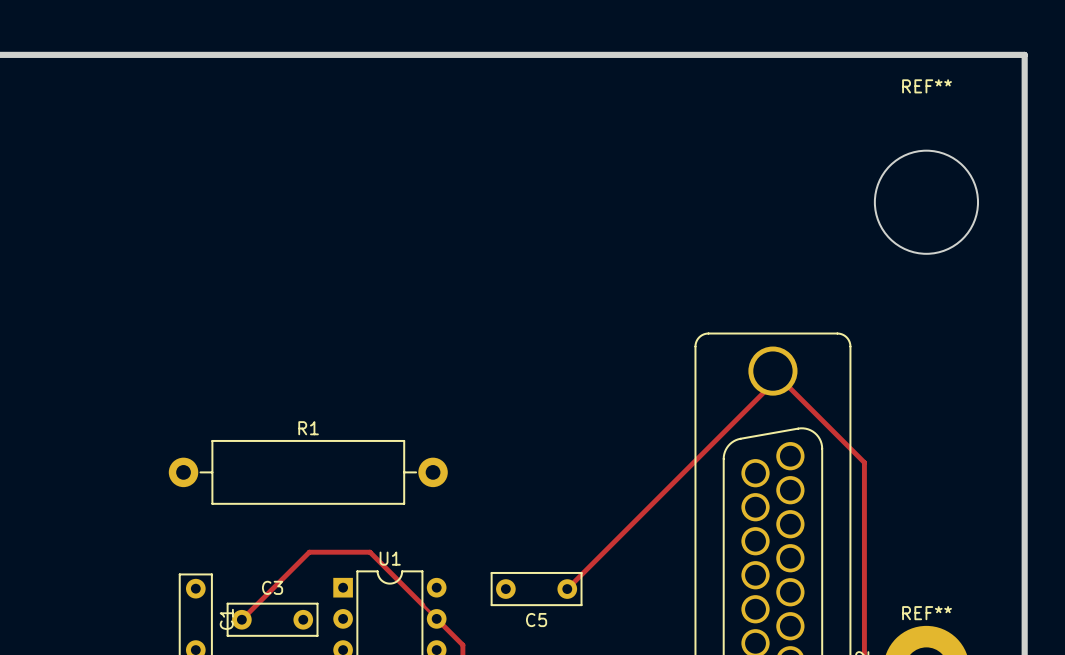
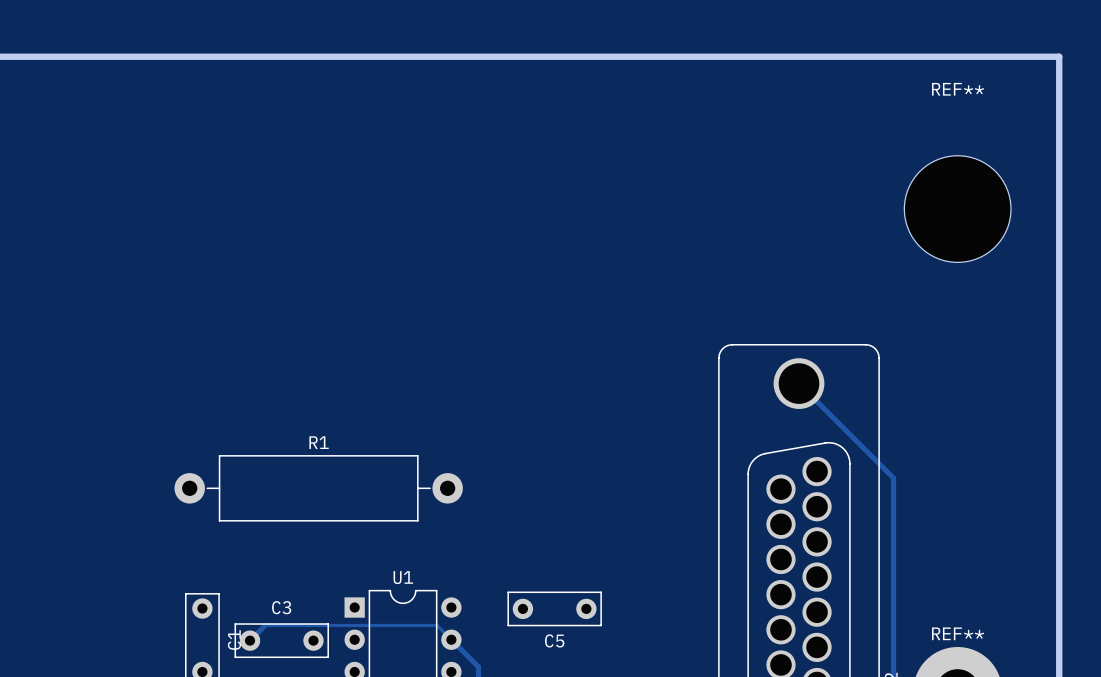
track: (772, 371) (772, 383) (567, 589) -> none
track: (256, 605) (309, 552) (370, 552) (422, 605) -> (265, 625) (437, 625)

